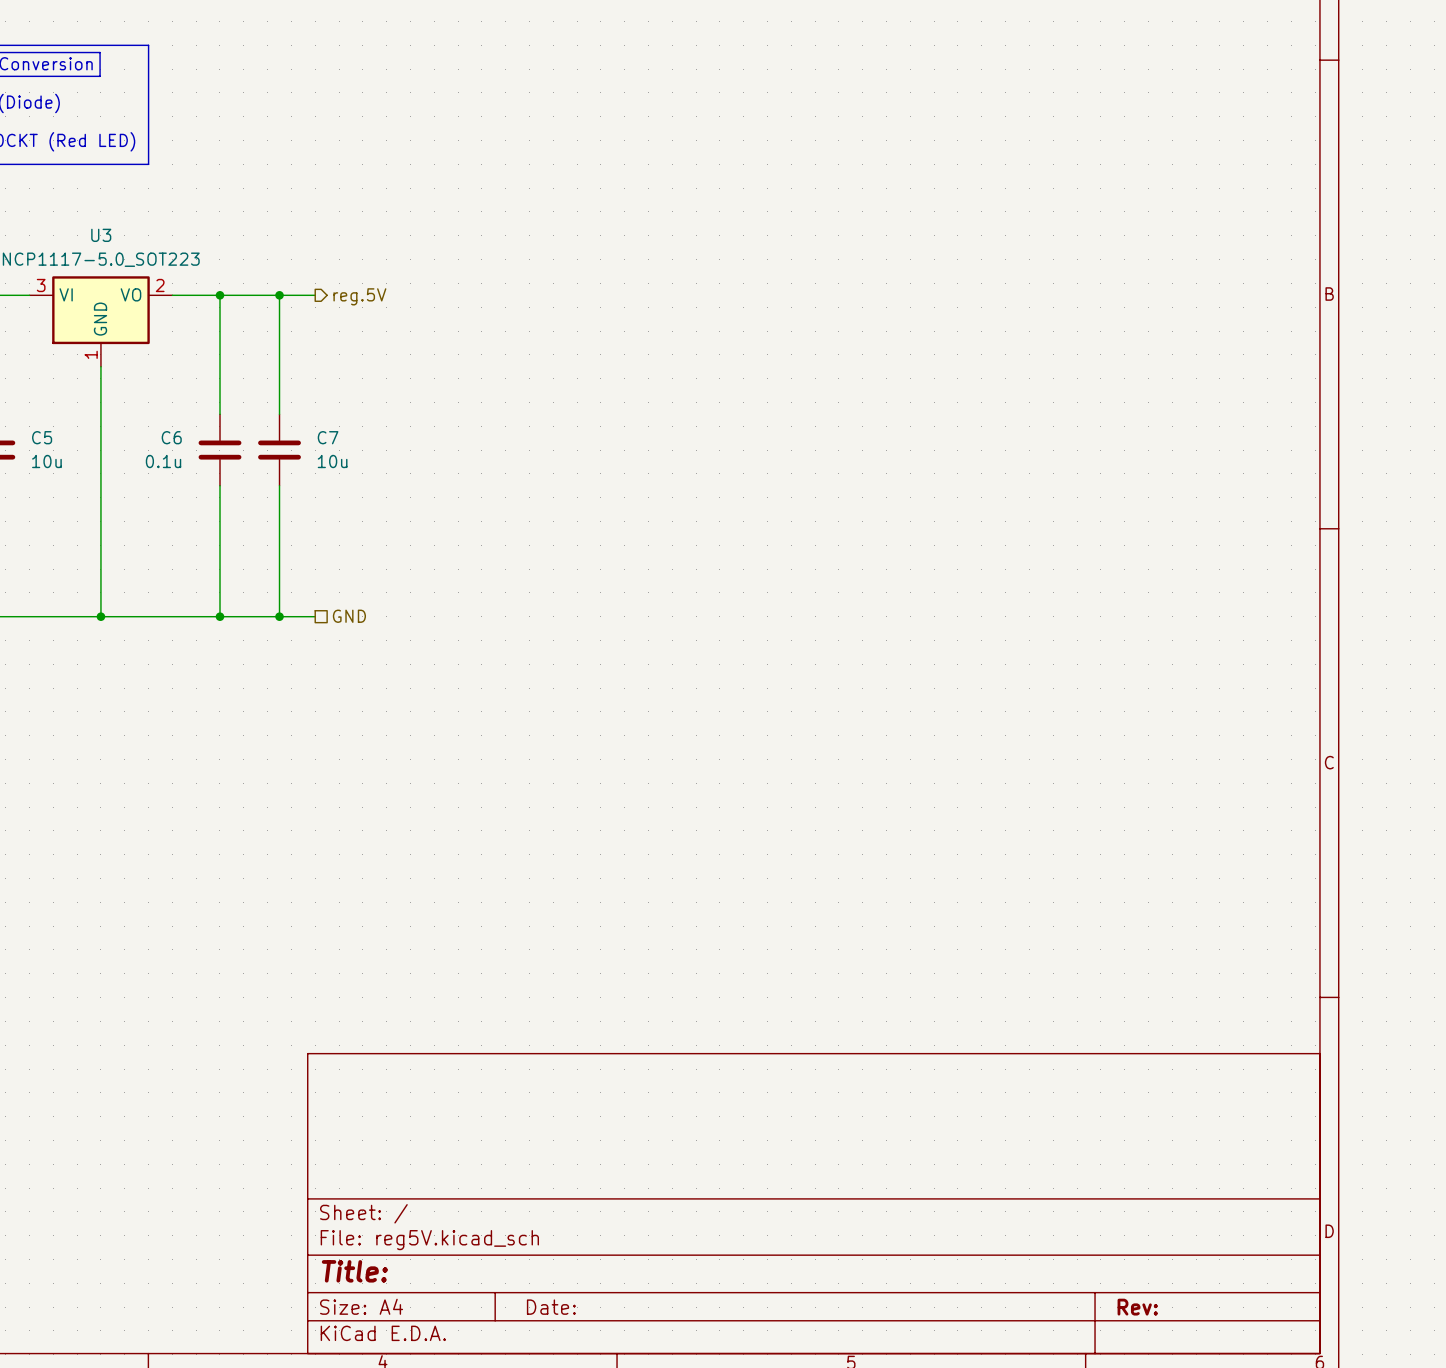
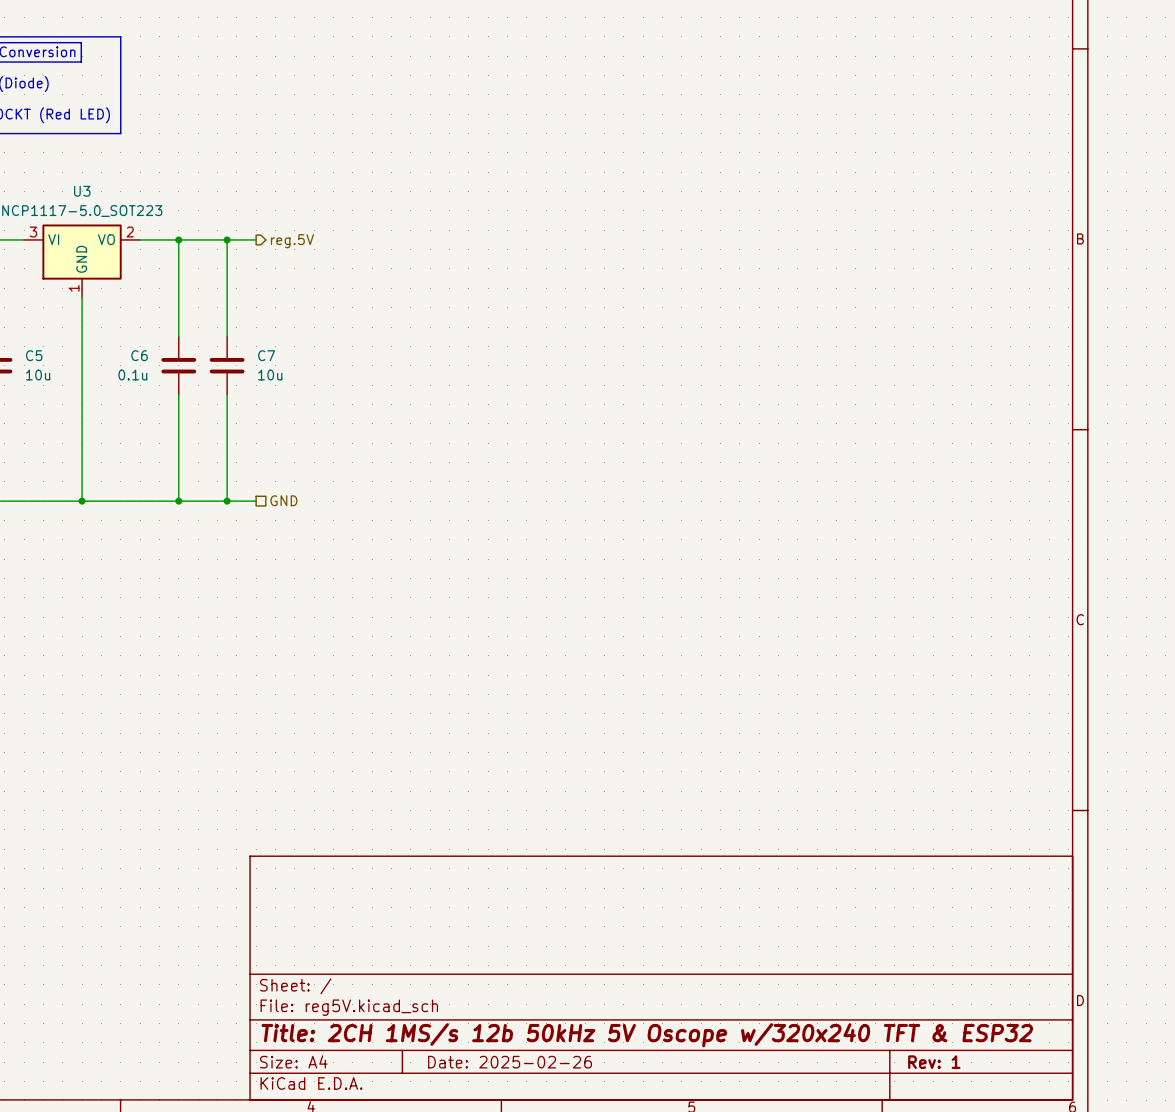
title block: Title: (354, 1271) -> Title: 2CH 1MS/s 12b 50kHz 5V Oscope w/320x240 TFT & ESP32 (647, 1035)
title block: Date: (551, 1307) -> Date: 2025-02-26 (510, 1062)
title block: Rev: (1137, 1307) -> Rev: 1 (934, 1062)

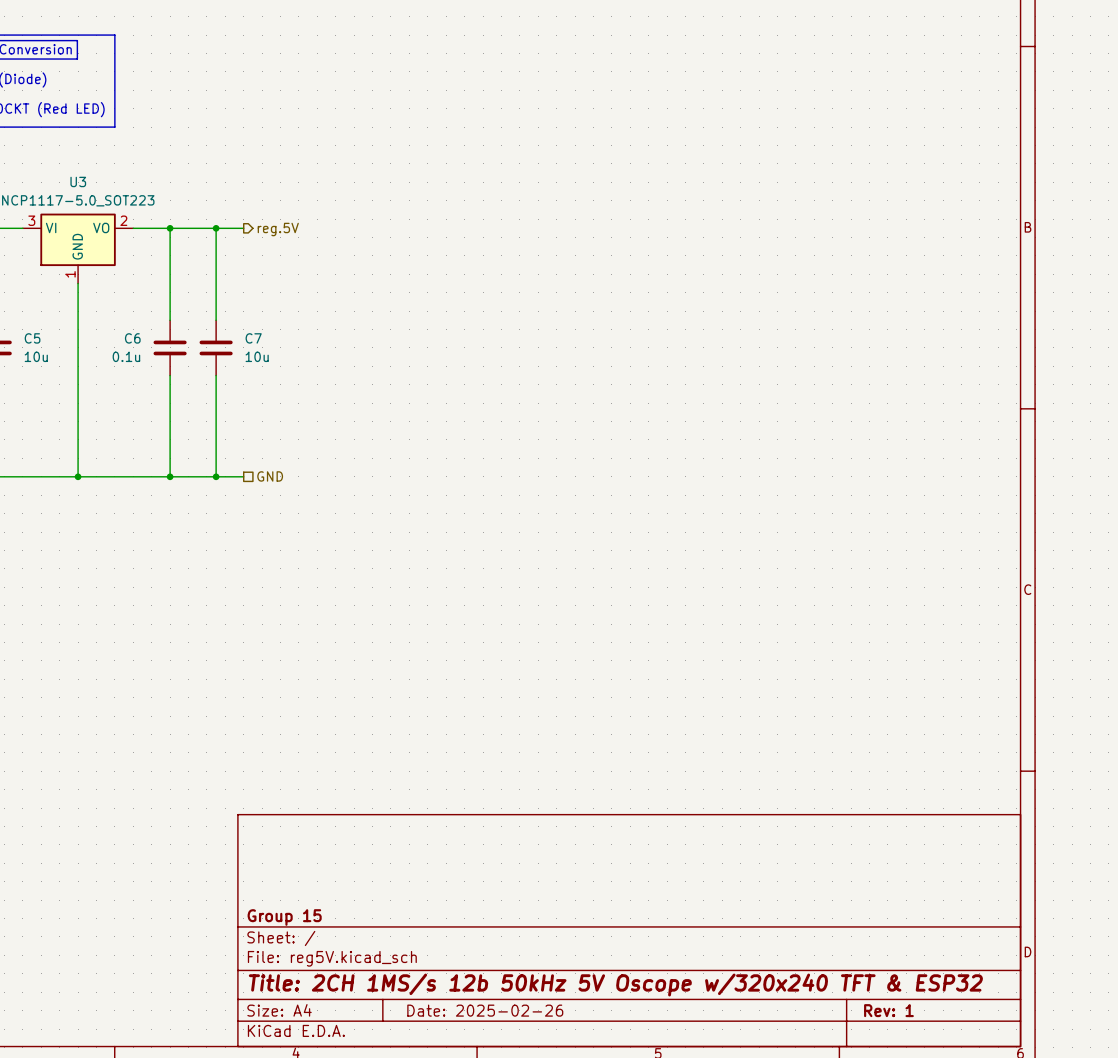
title block: none -> Group 15 (284, 917)

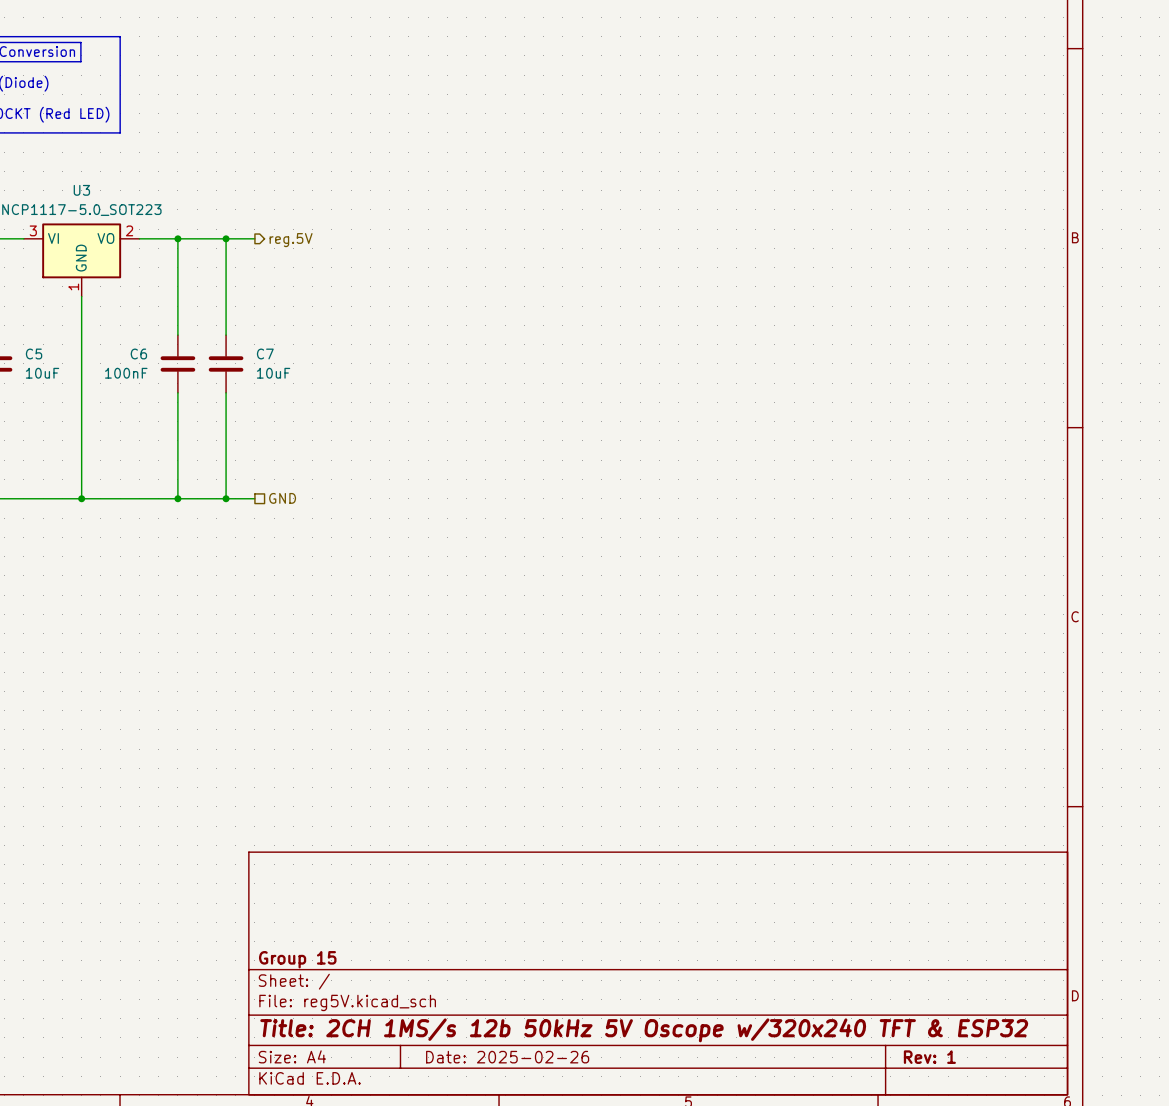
C5 value: 10u (36, 356) -> 10uF (42, 373)
C6 value: 0.1u (126, 356) -> 100nF (126, 373)
C7 value: 10u (257, 356) -> 10uF (273, 373)

